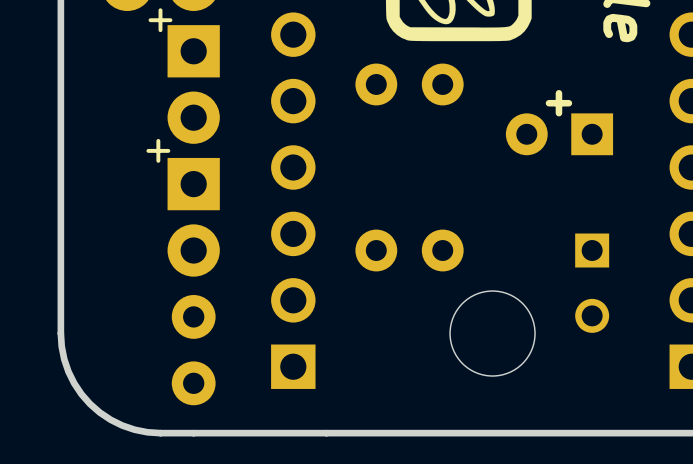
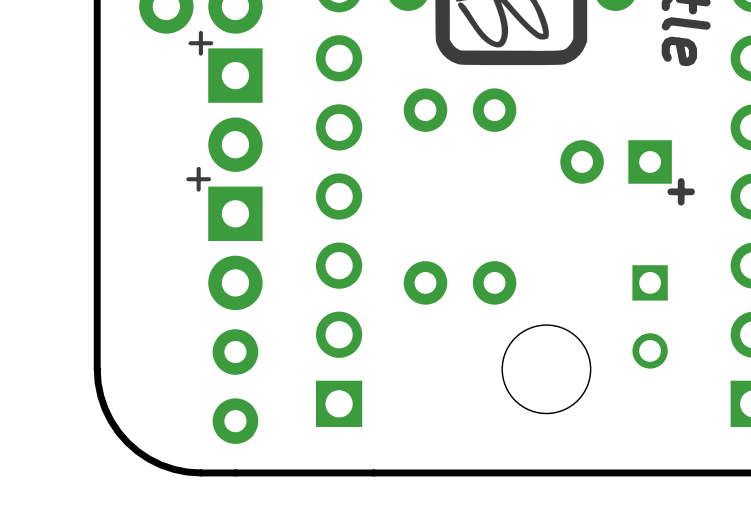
text position: + (558, 103) -> + (681, 191)

